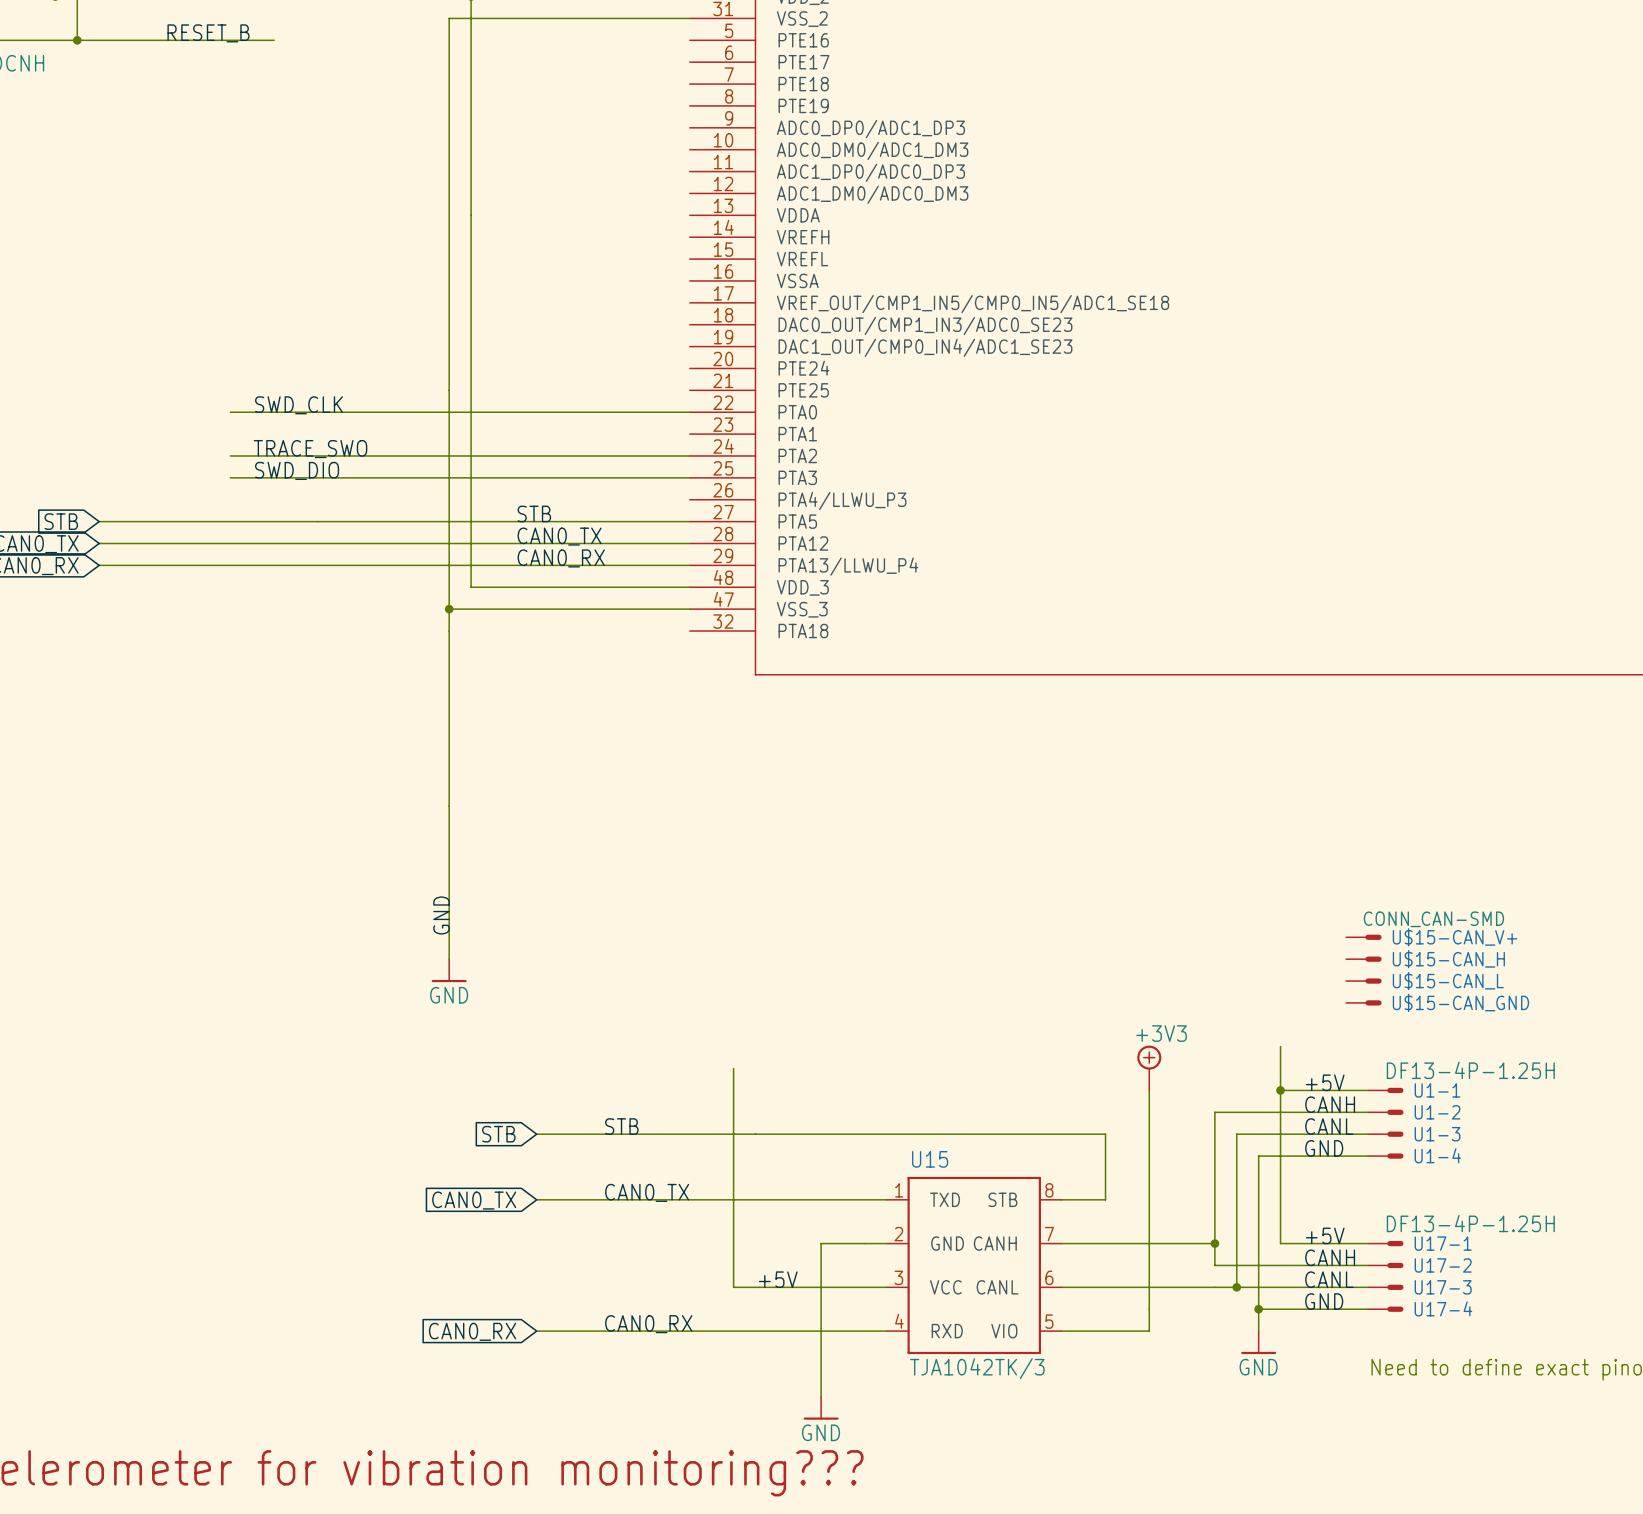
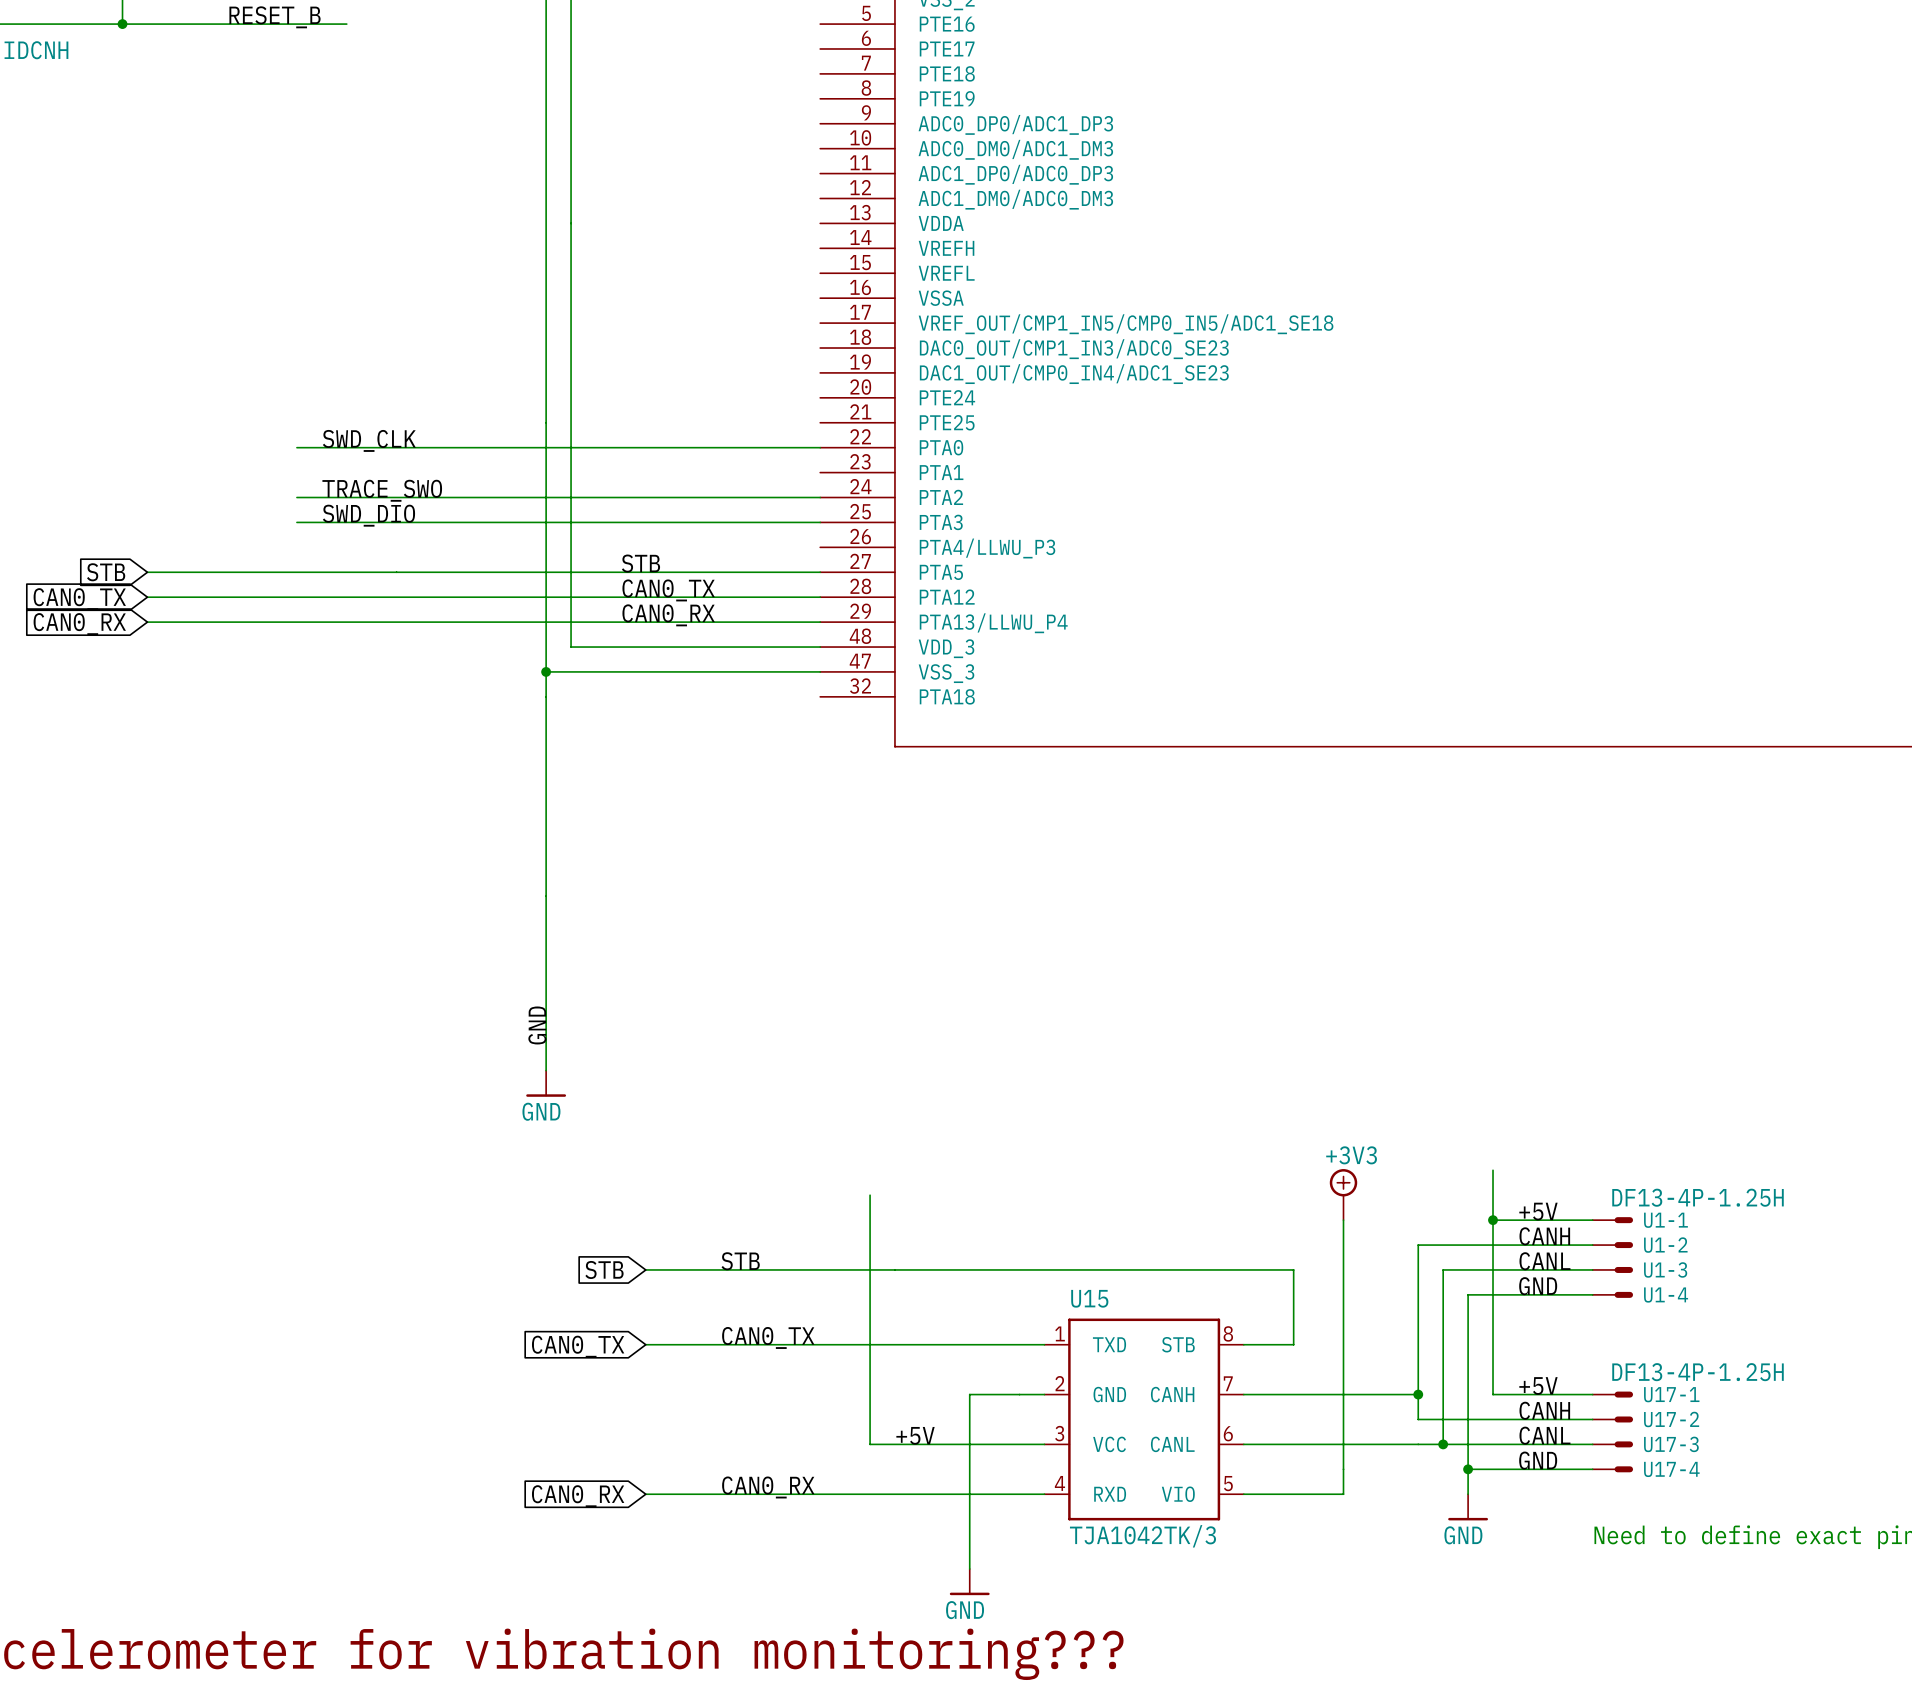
U$15-CAN_V+: CONN_CAN-SMD (1363, 937) -> none
U$15-CAN_H: (1363, 959) -> none
U$15-CAN_L: (1363, 981) -> none
U$15-CAN_GND: (1363, 1002) -> none

